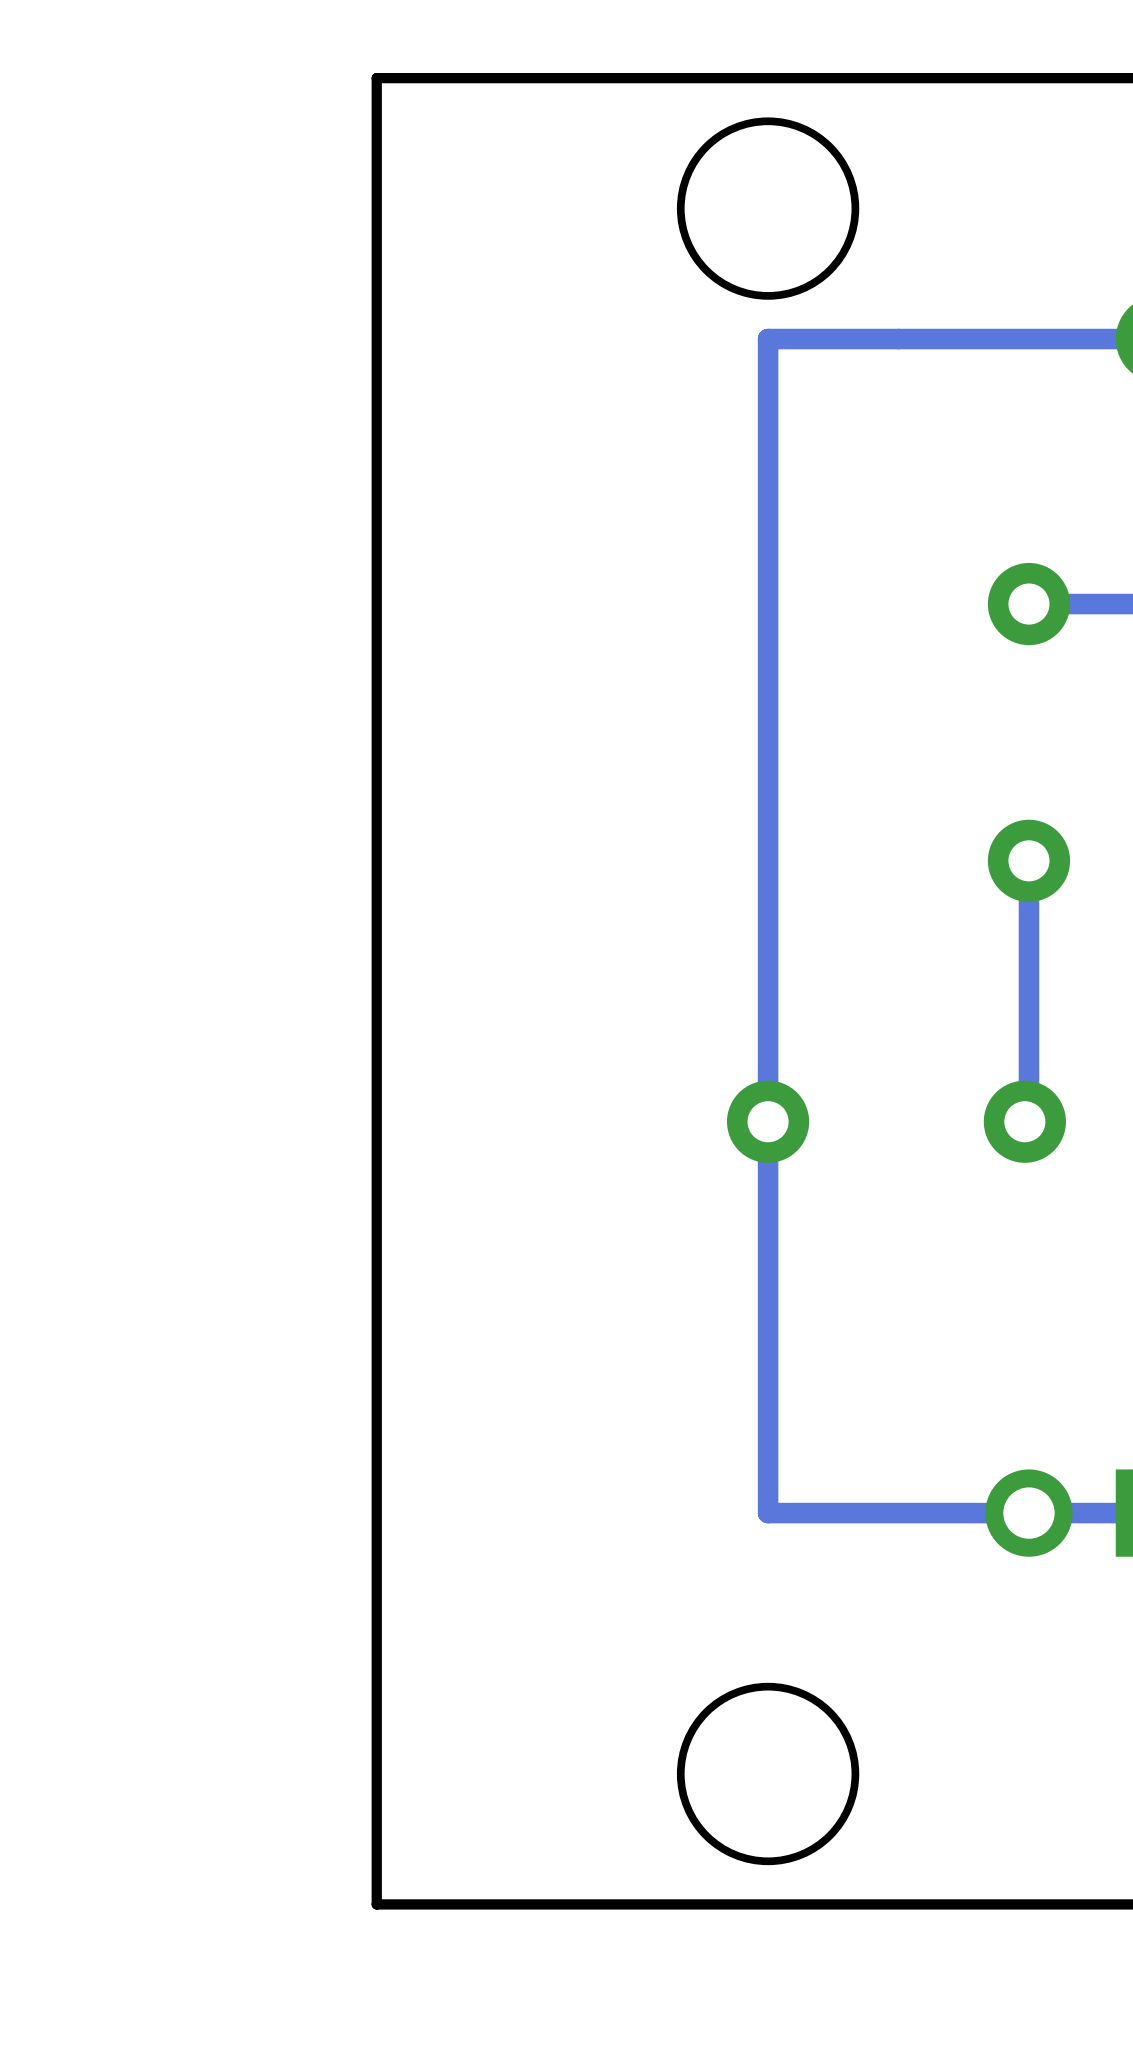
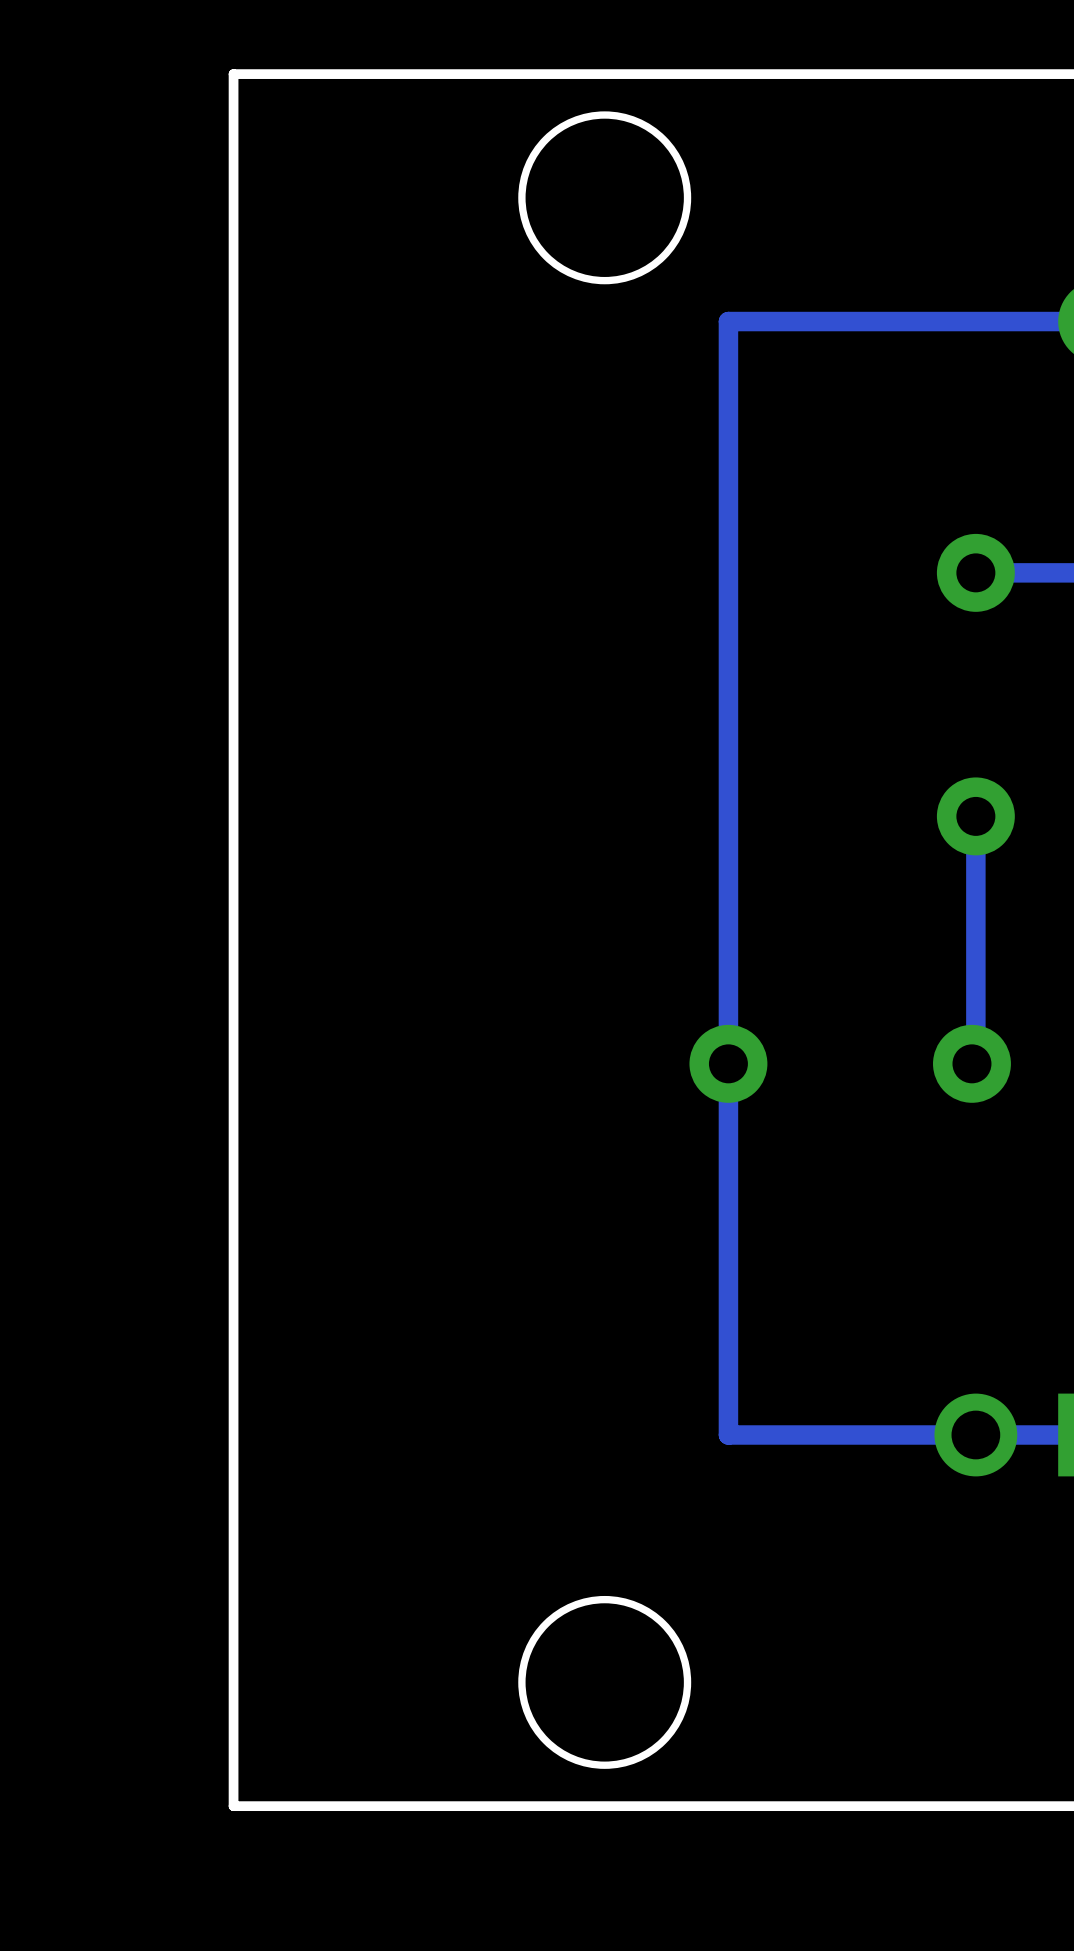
board edge: (376, 78) (376, 1904) -> (357, 74) (233, 74) (233, 1806) (357, 1806)
round board edge position: (768, 208) -> (604, 197)
round board edge position: (768, 1773) -> (604, 1682)

